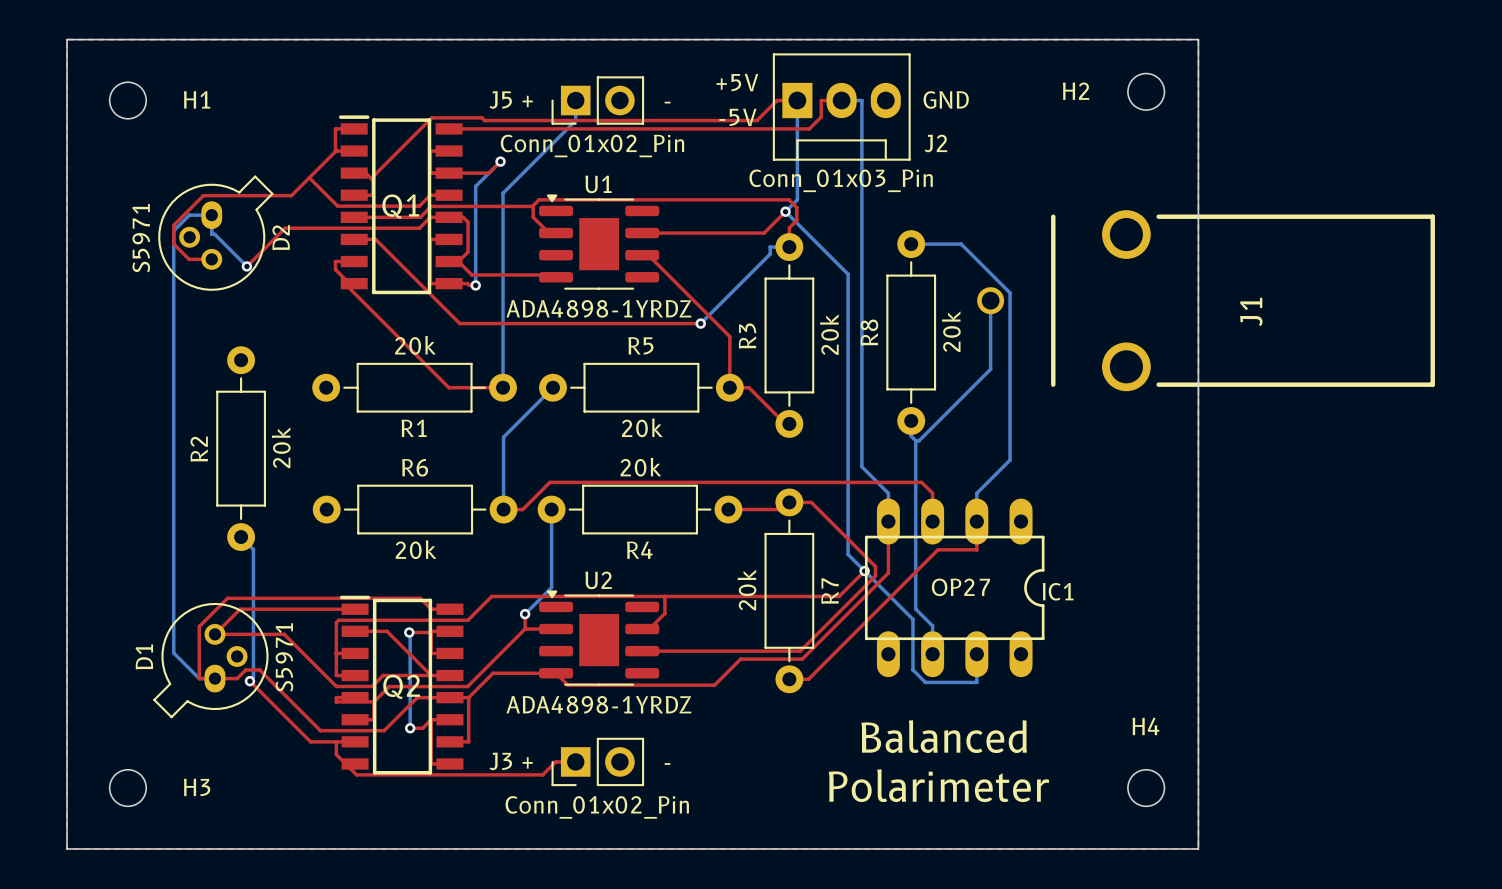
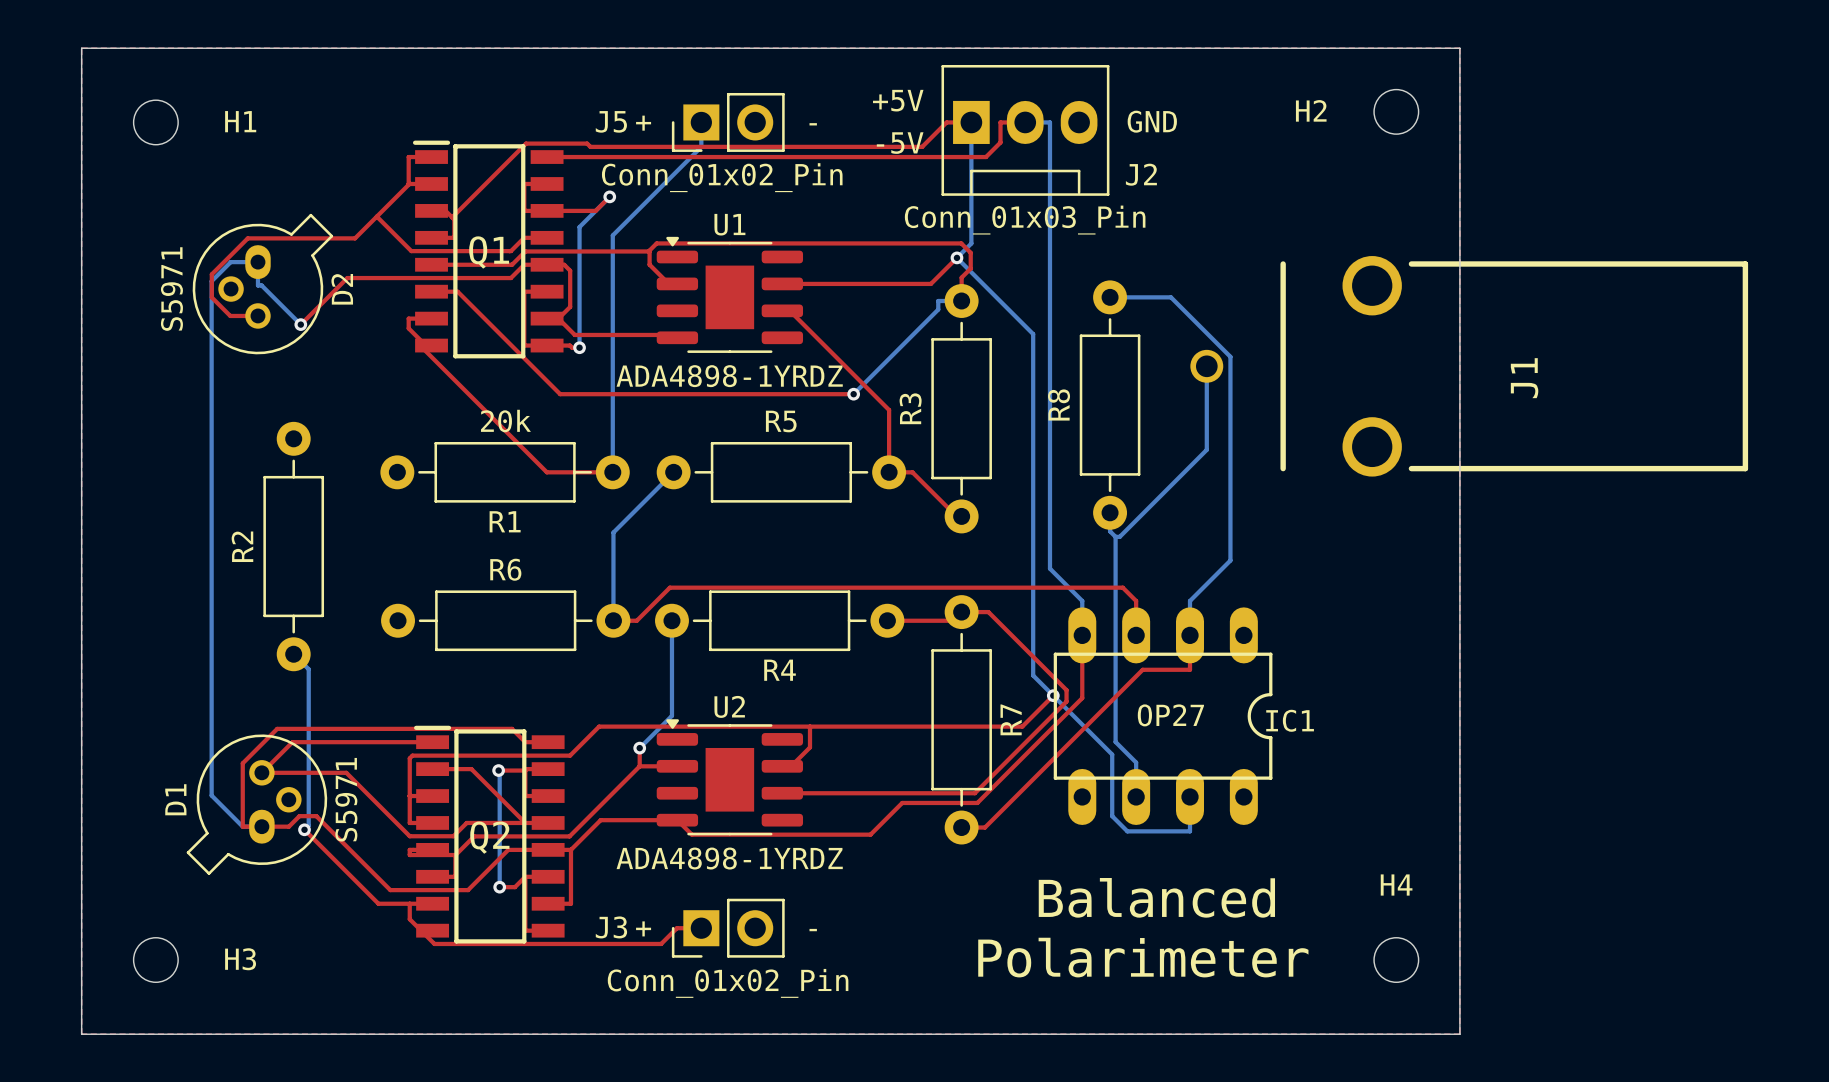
R8 value: 20k (951, 331) -> none
R3 value: 20k (829, 334) -> none
R5 value: 20k (642, 427) -> none
R2 value: 20k (281, 447) -> none
R4 value: 20k (640, 467) -> none
R6 value: 20k (416, 549) -> none
R7 value: 20k (746, 589) -> none

